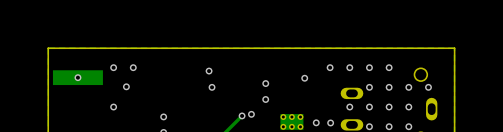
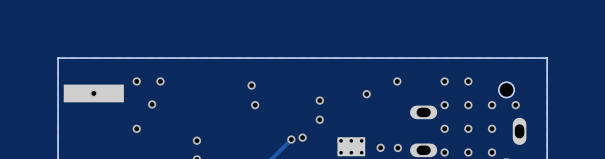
via: (349, 67) -> none
via: (349, 107) -> none

